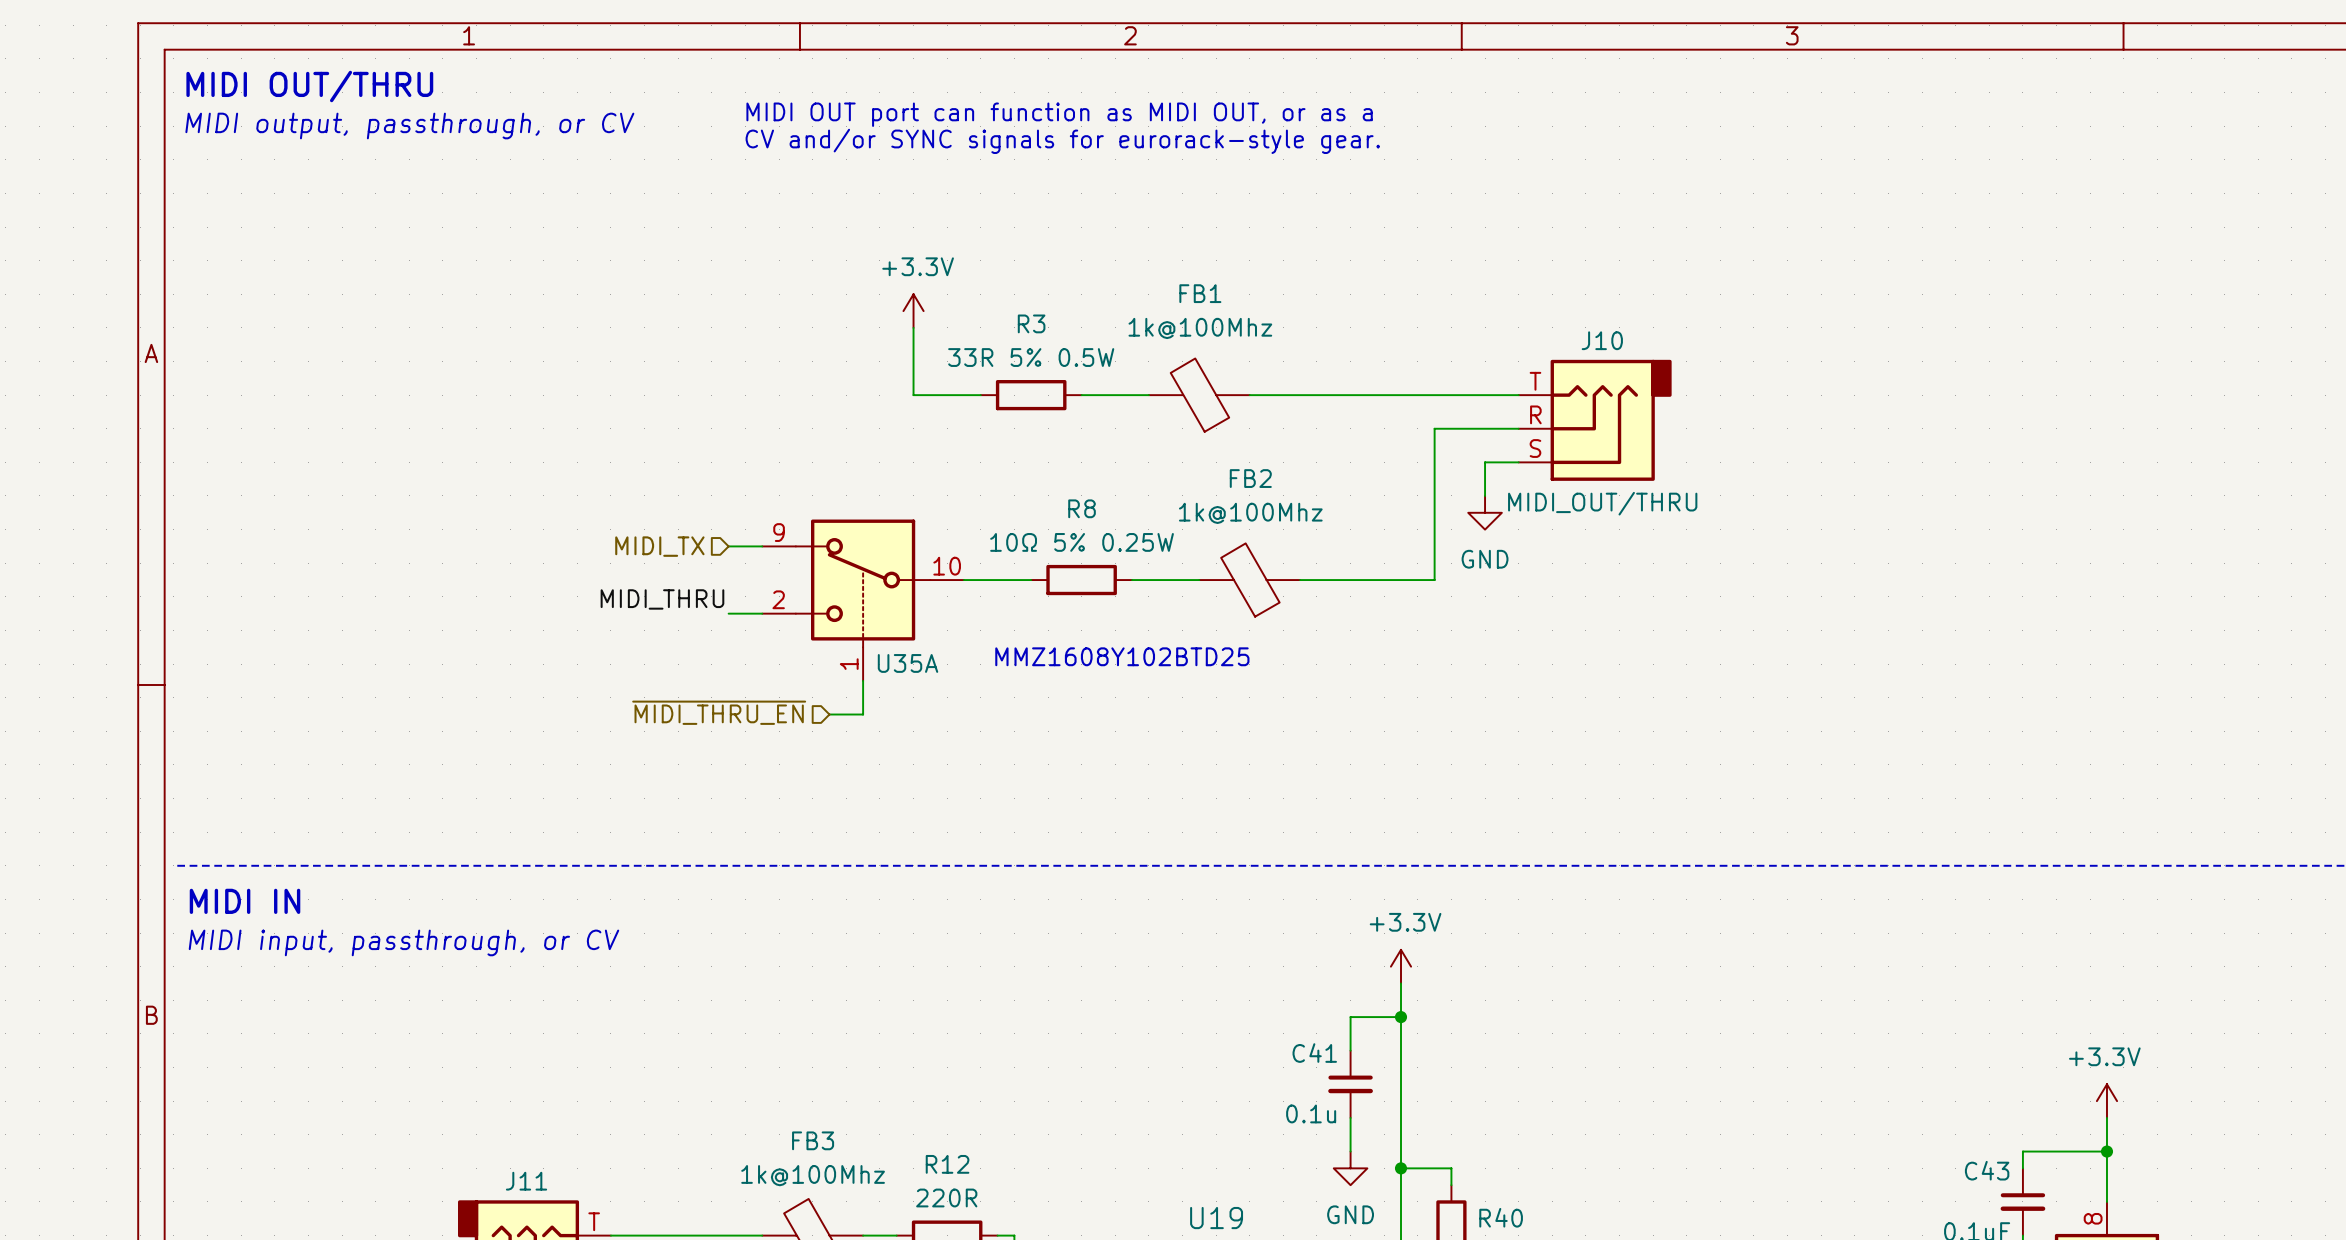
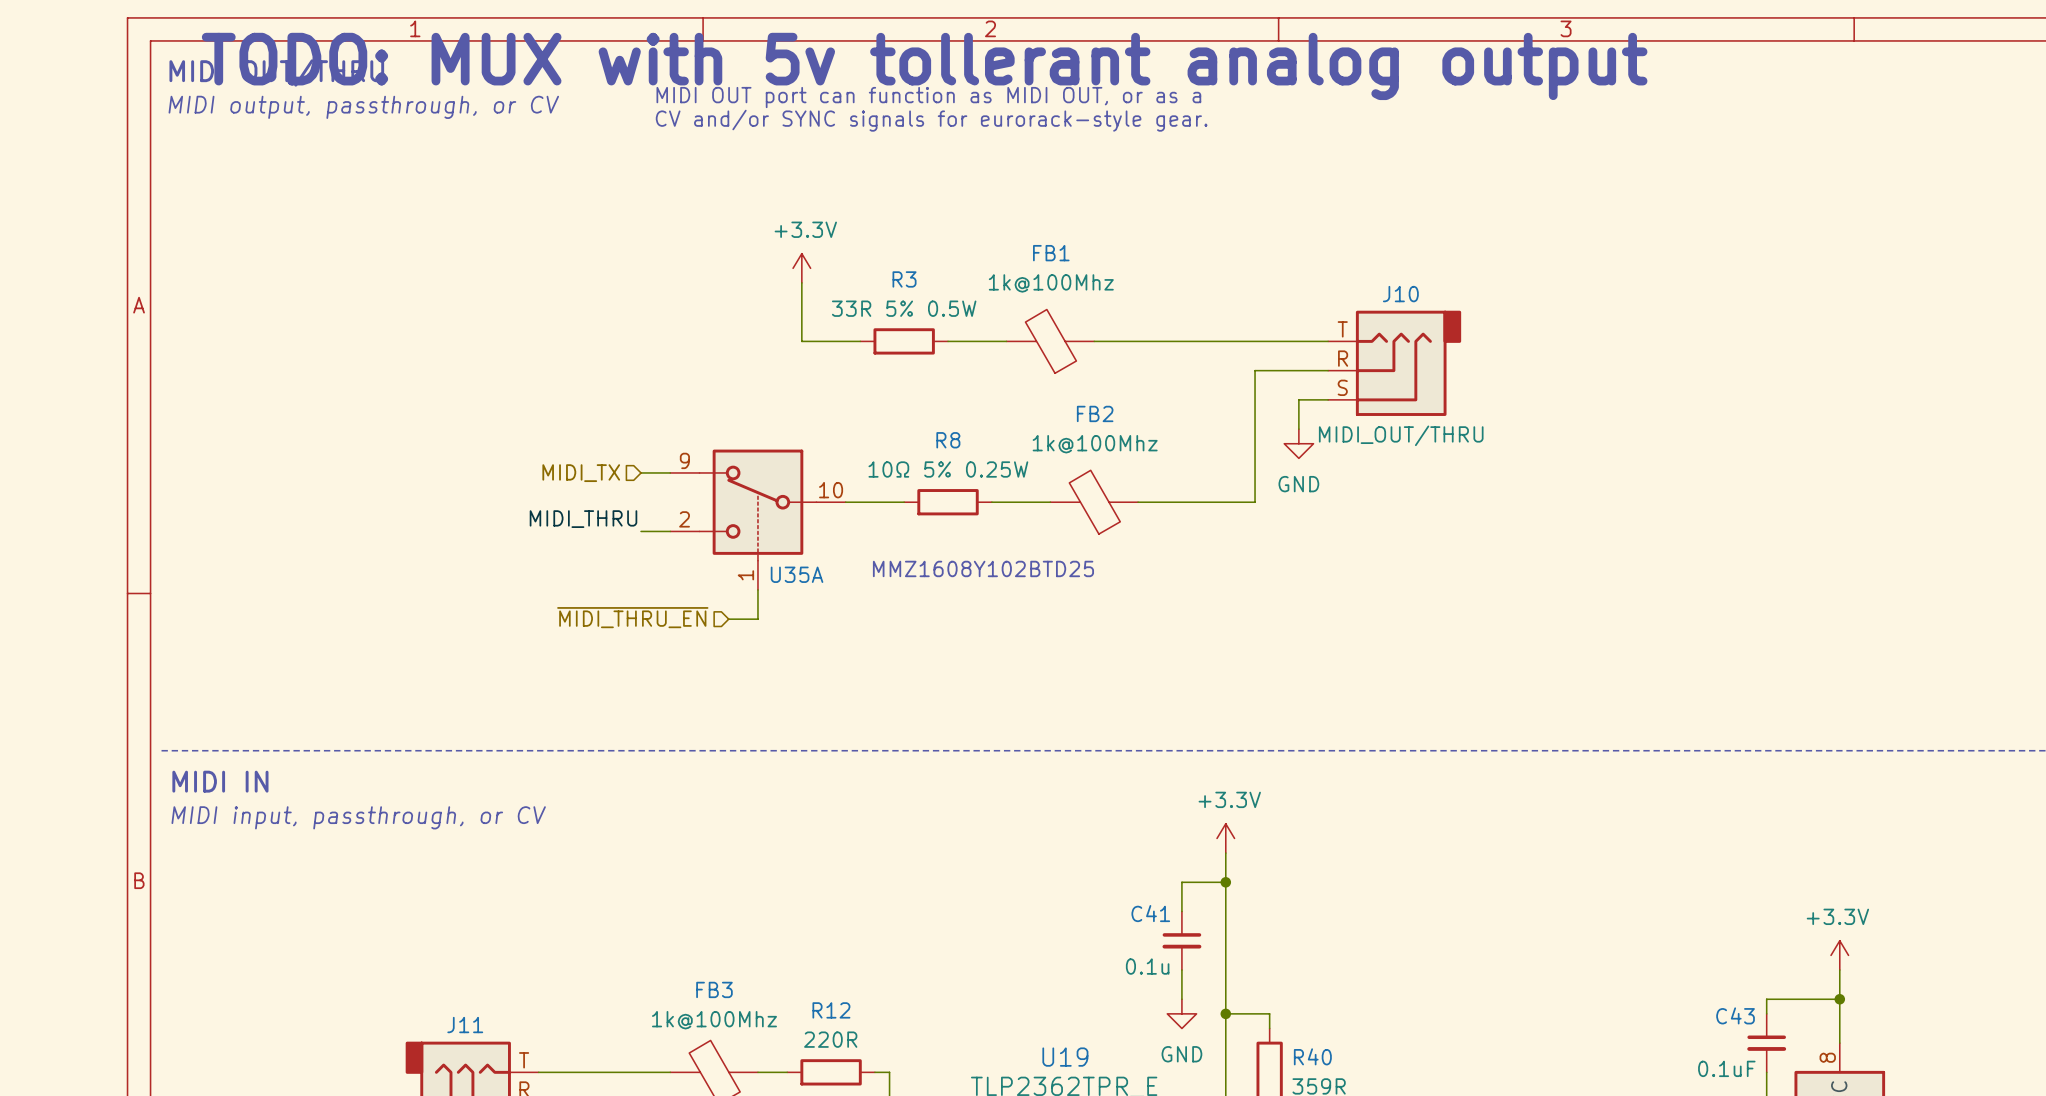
text: none -> TODO: MUX with 5v tollerant analog output (924, 66)

